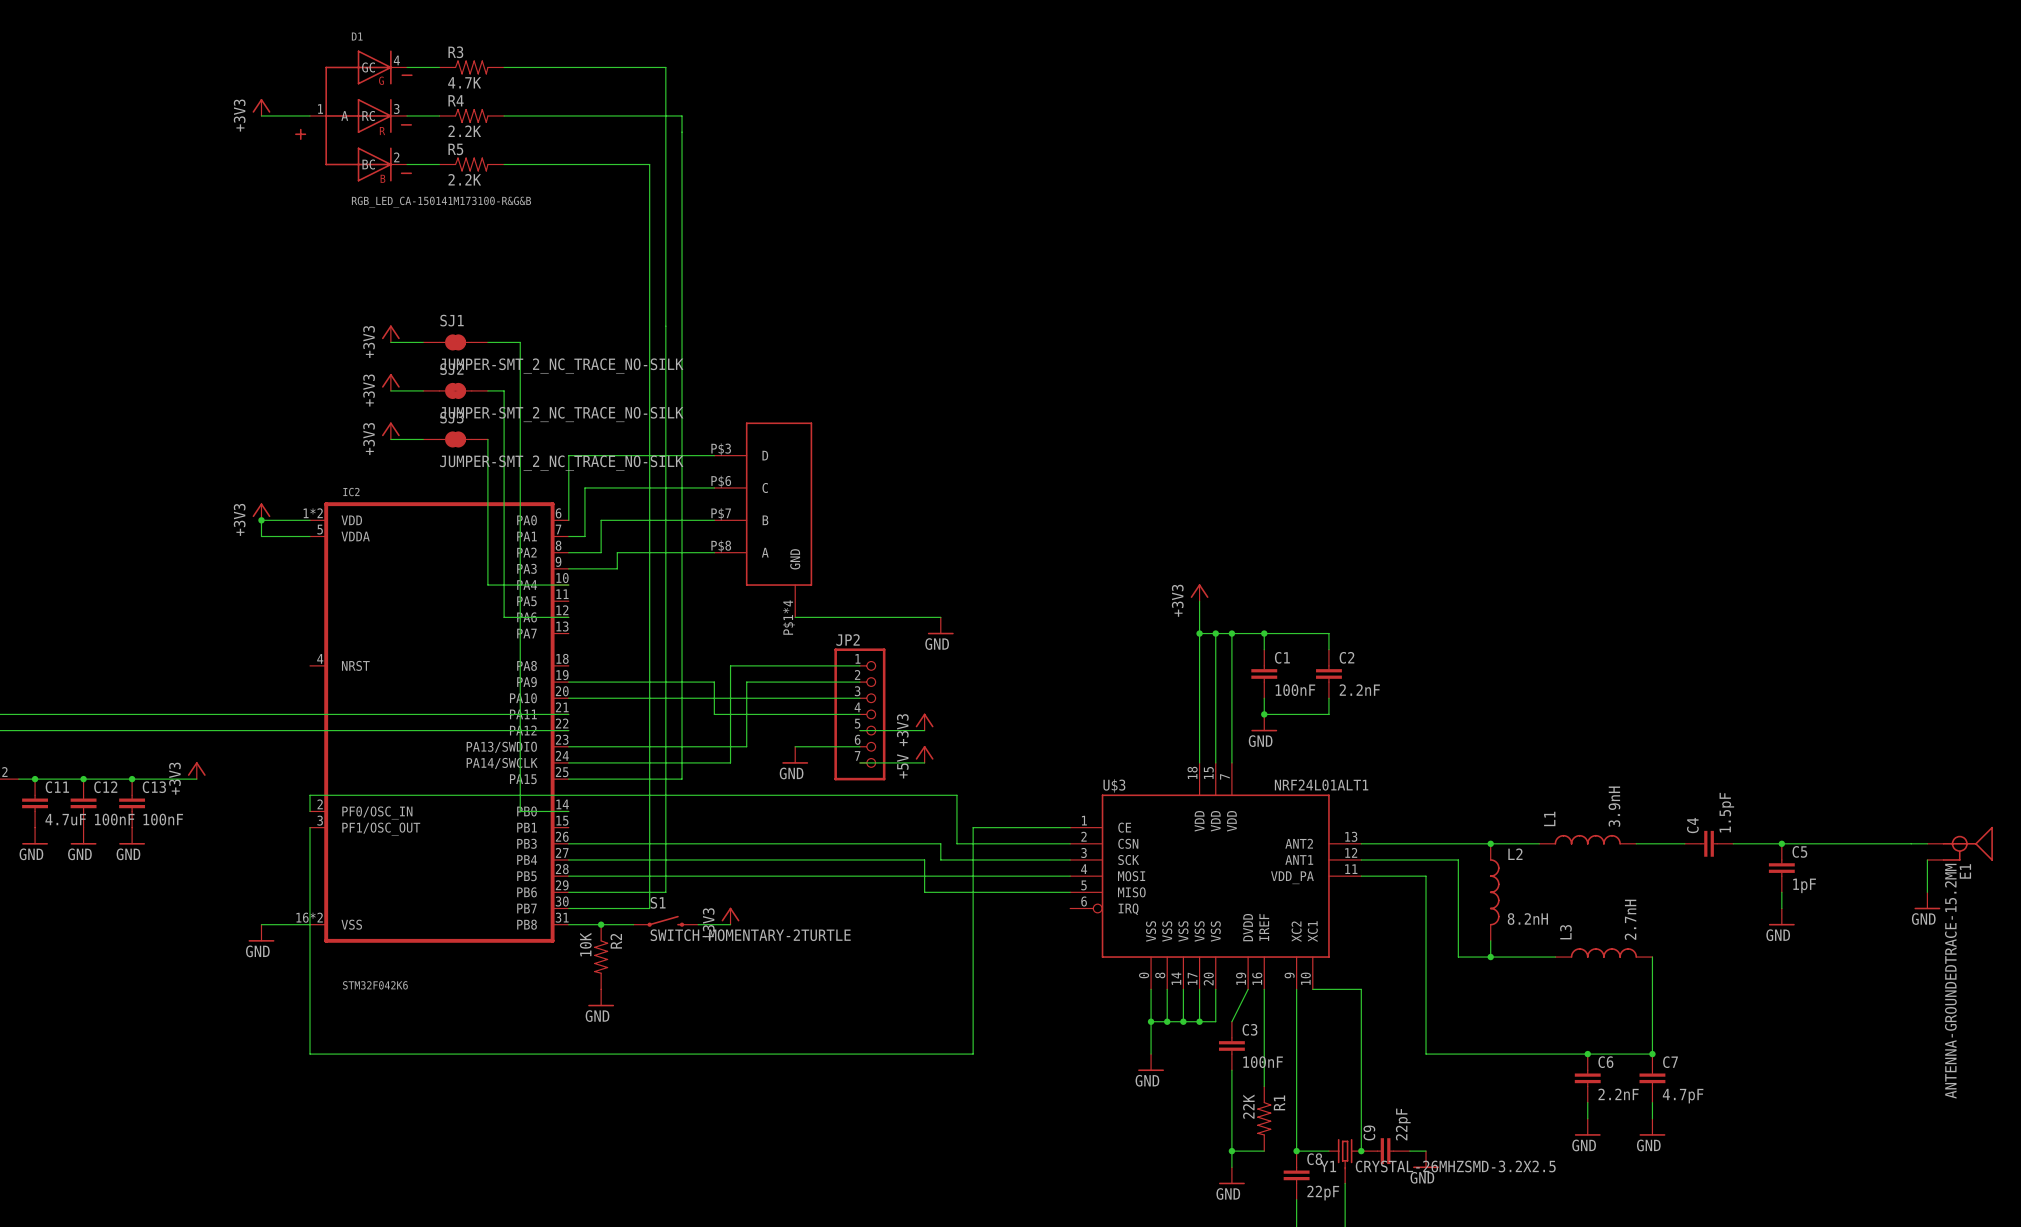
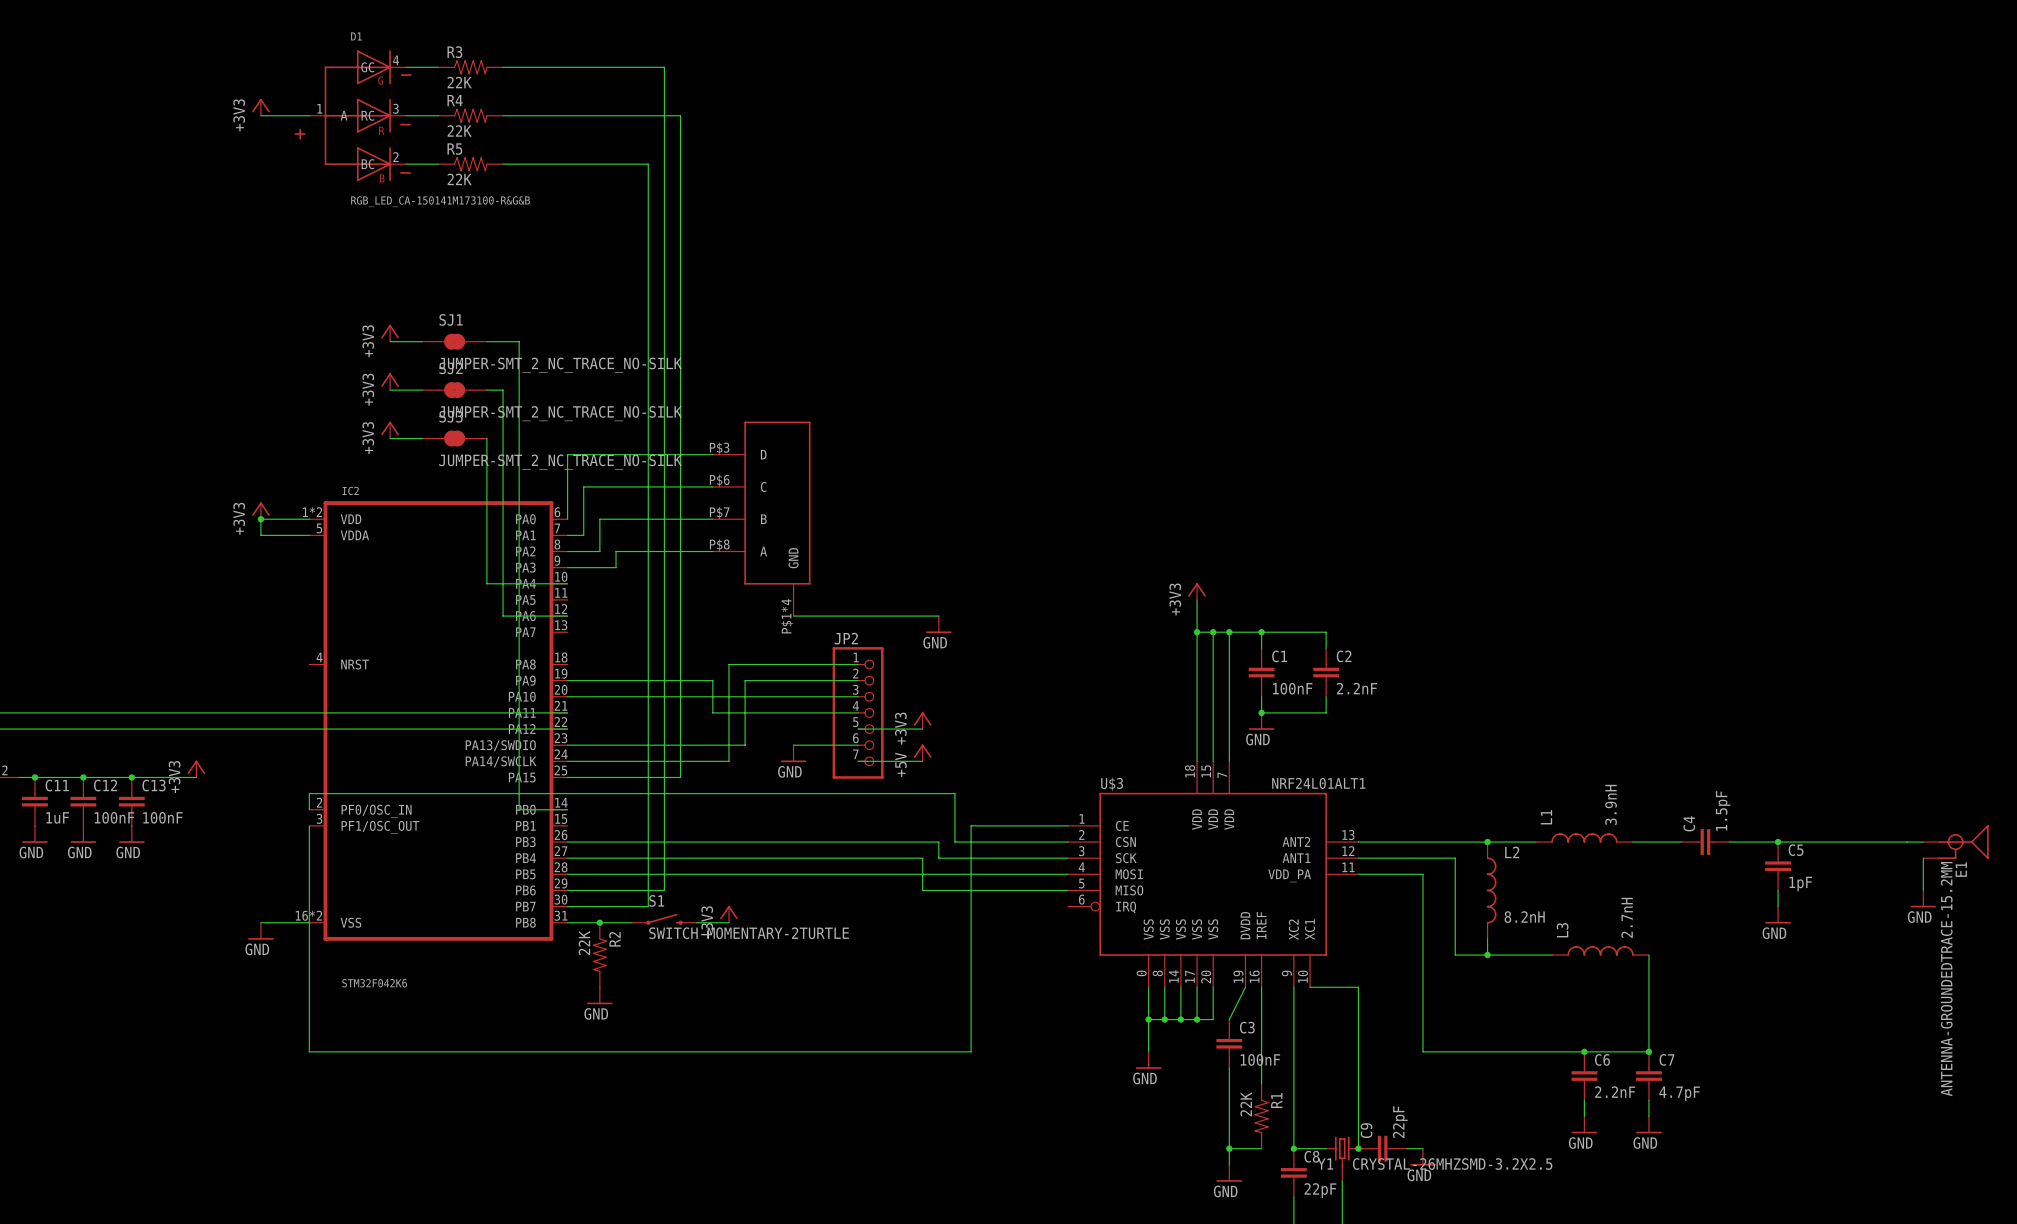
R3 value: 4.7K (464, 82) -> 22K (459, 82)
R4 value: 2.2K (464, 131) -> 22K (459, 130)
R5 value: 2.2K (464, 179) -> 22K (459, 179)
C11 value: 4.7uF (65, 819) -> 1uF (57, 817)
R2 value: 10K (585, 944) -> 22K (584, 942)

